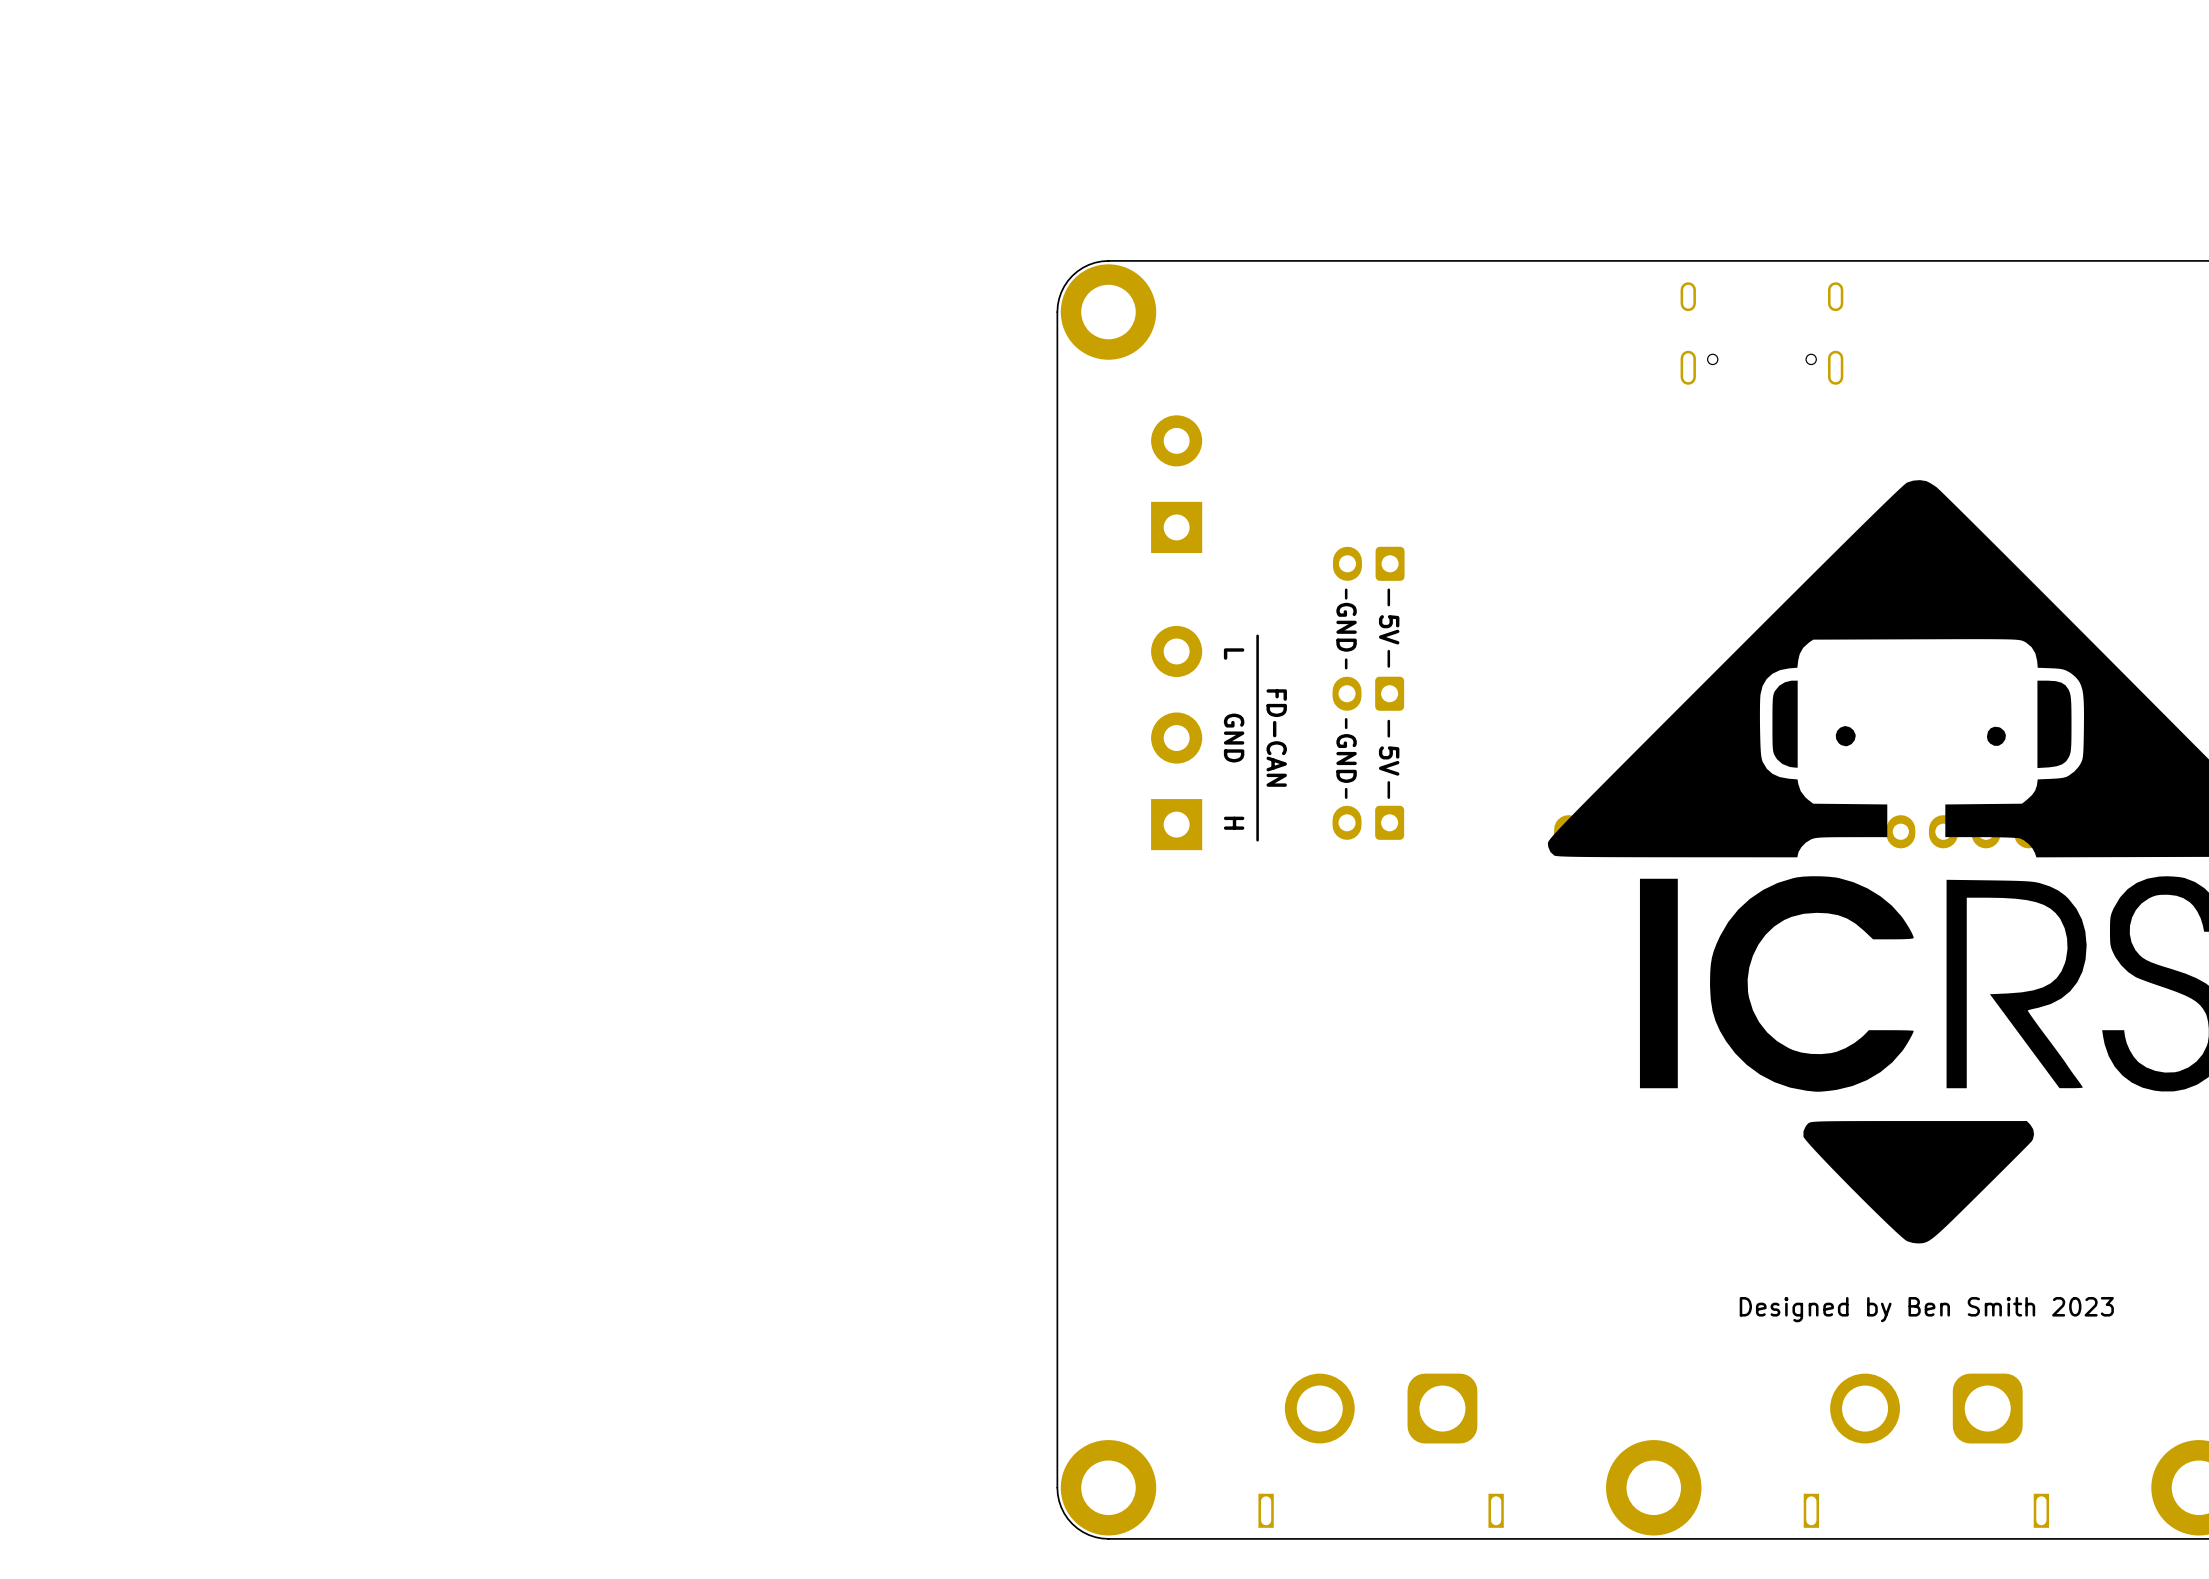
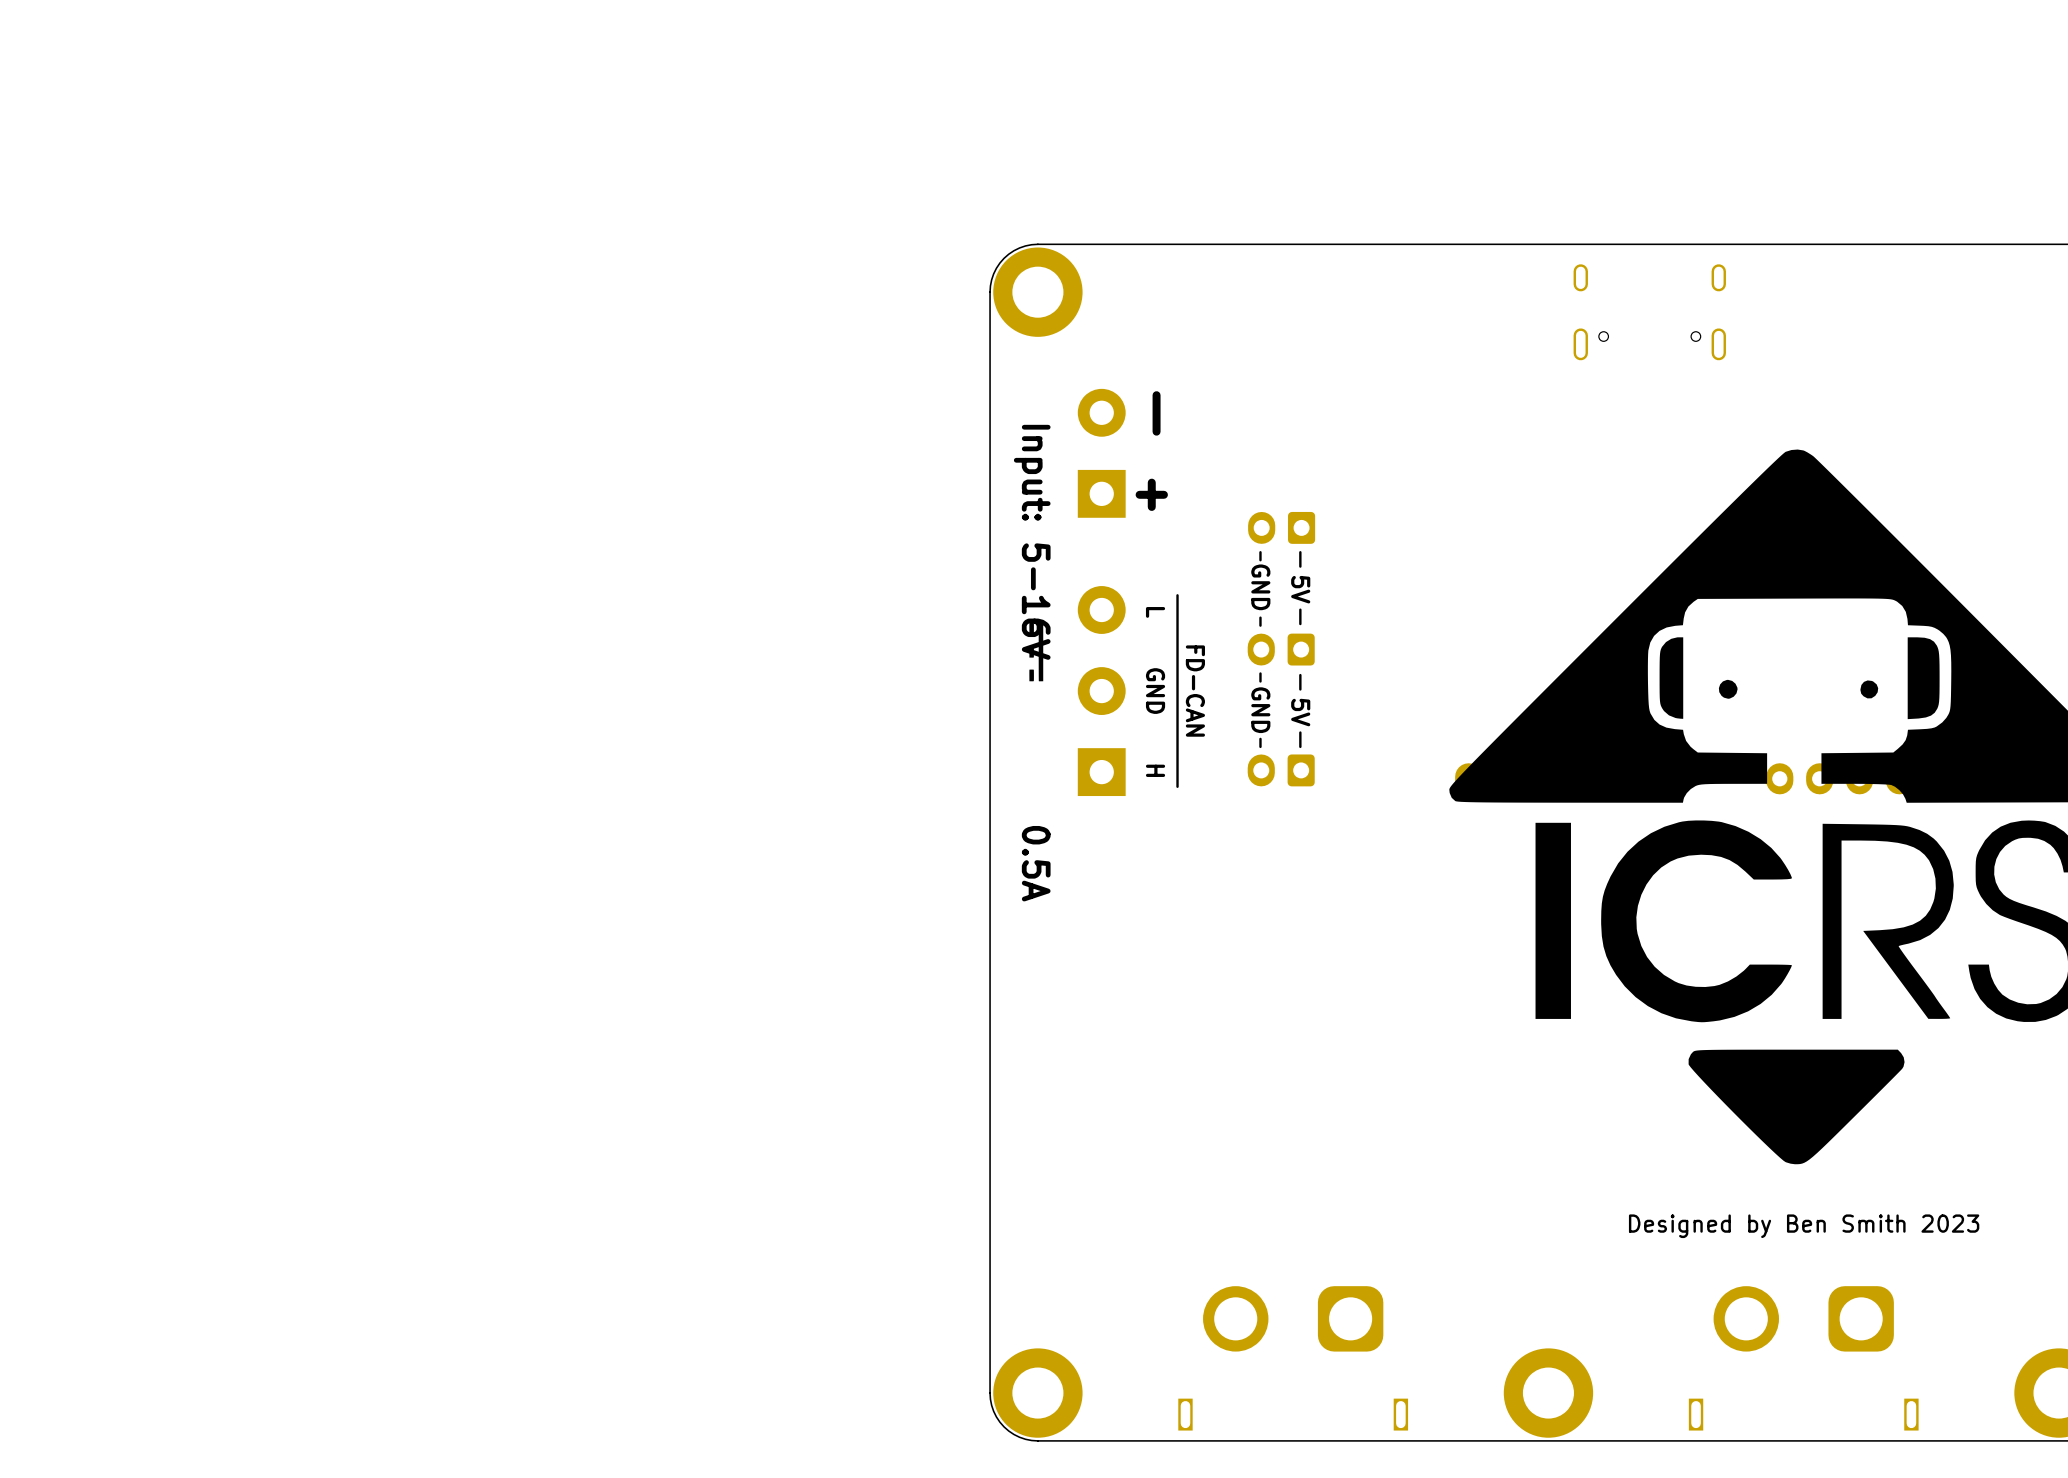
text: none -> - (1156, 413)
text: none -> + (1151, 494)
drawing: none -> [1029, 622, 1044, 682]
text: none -> Input: 5-16V 0.5A (1032, 663)

